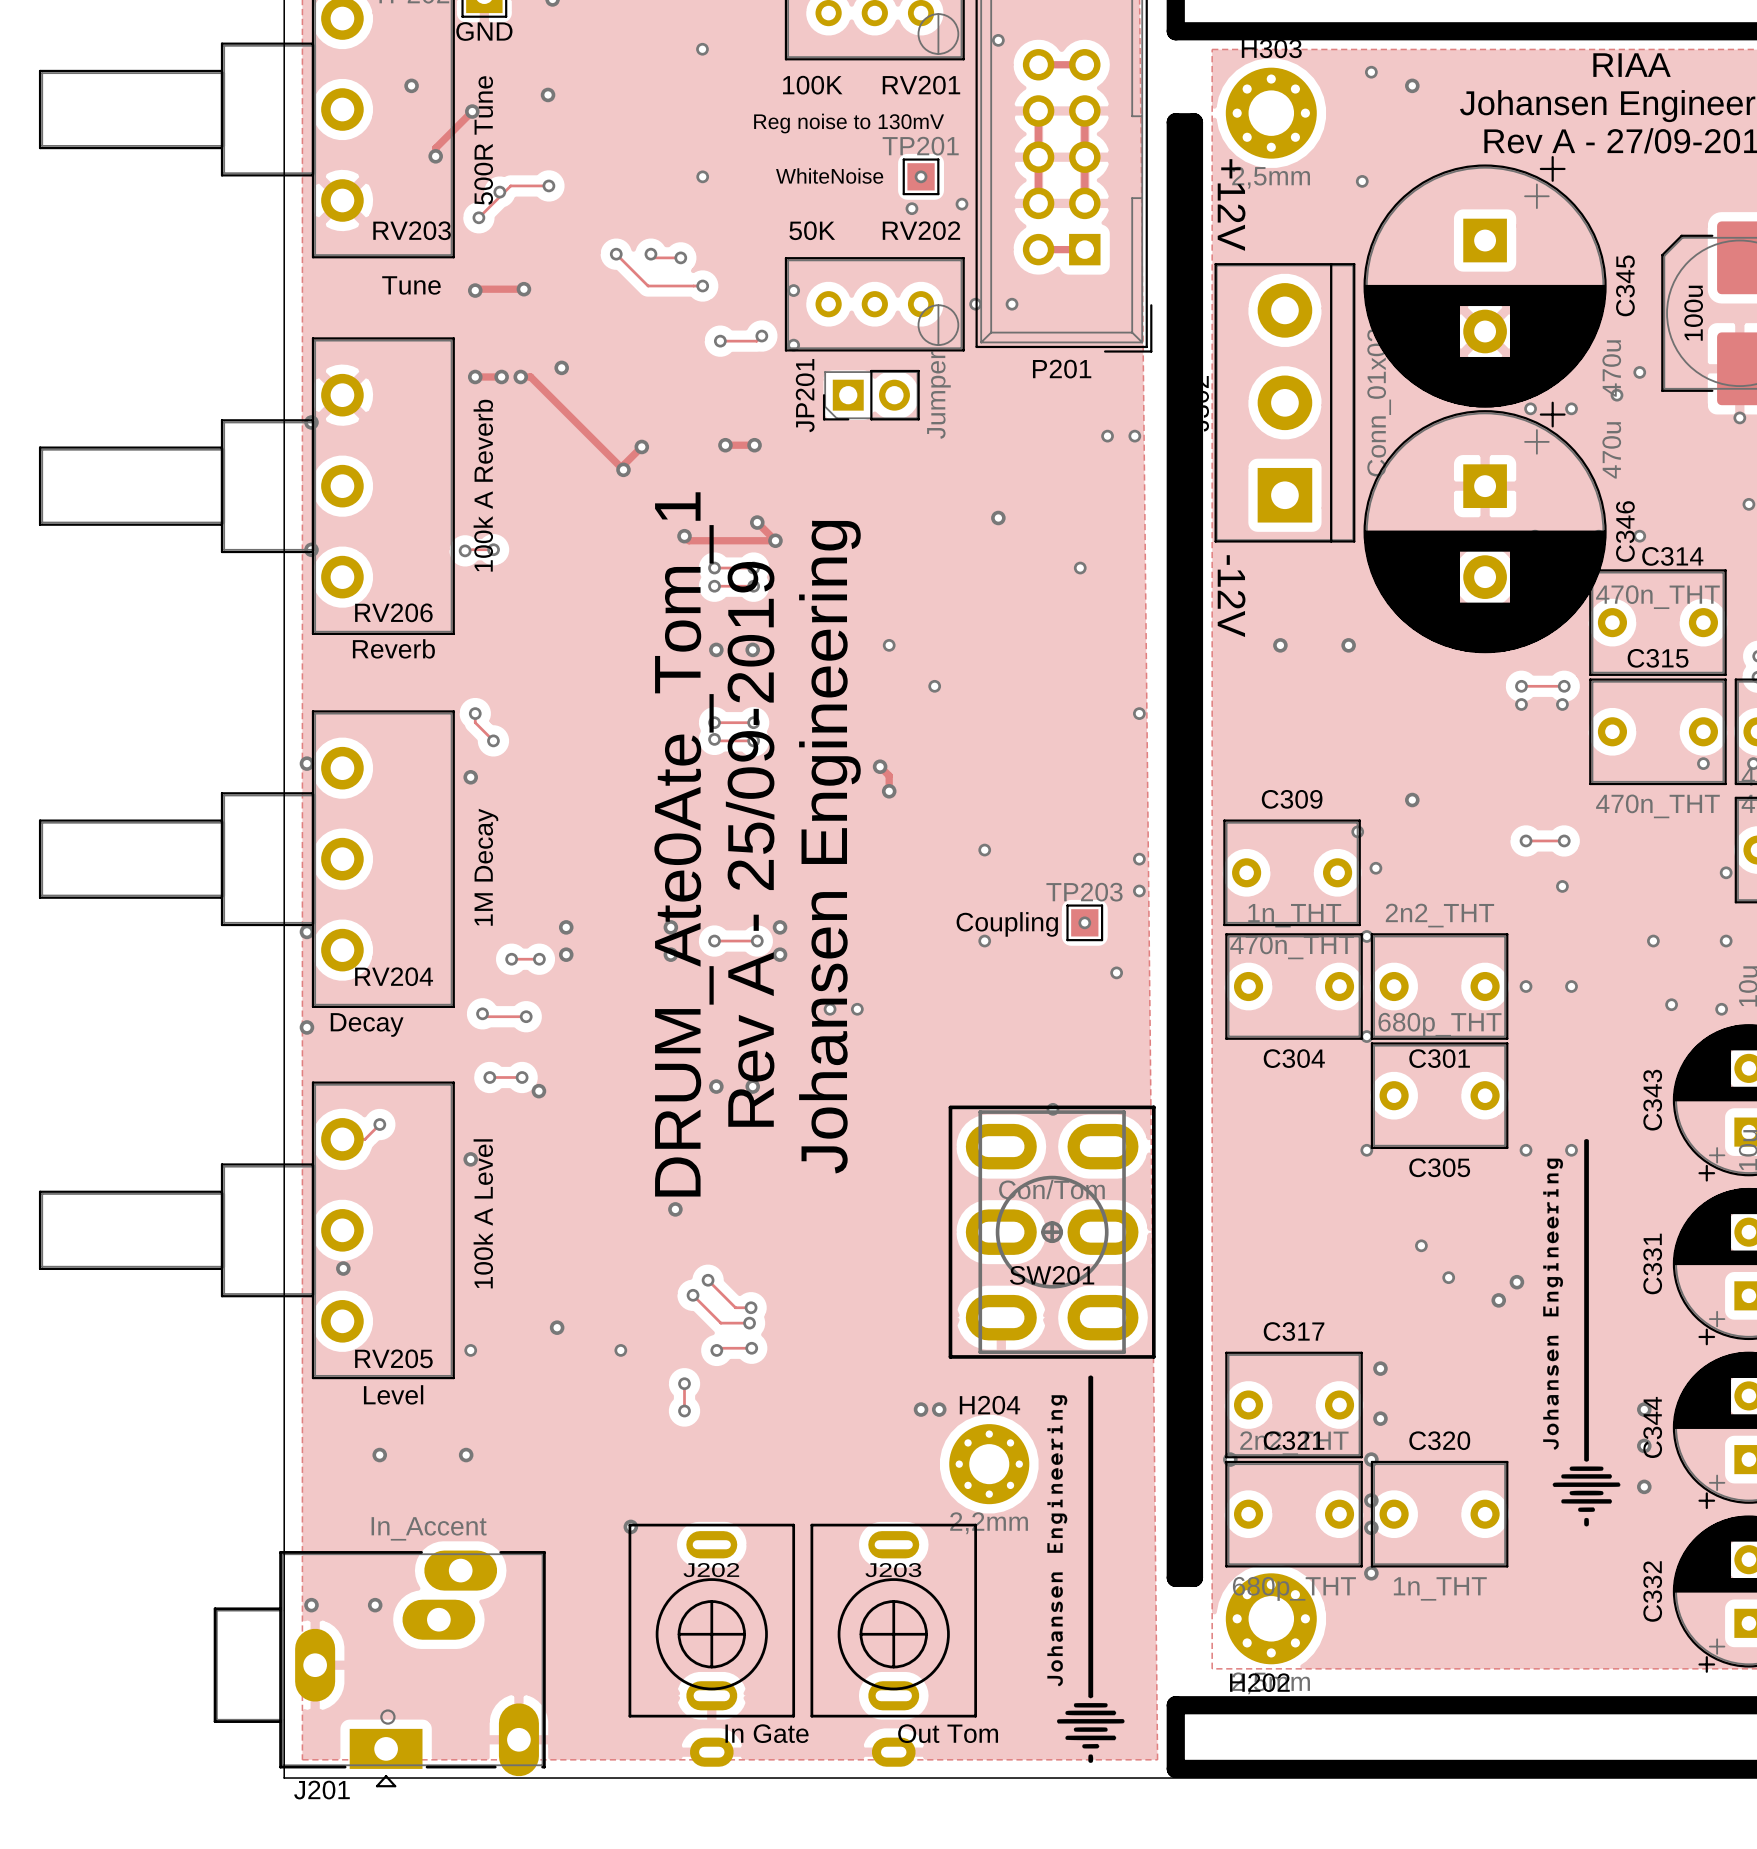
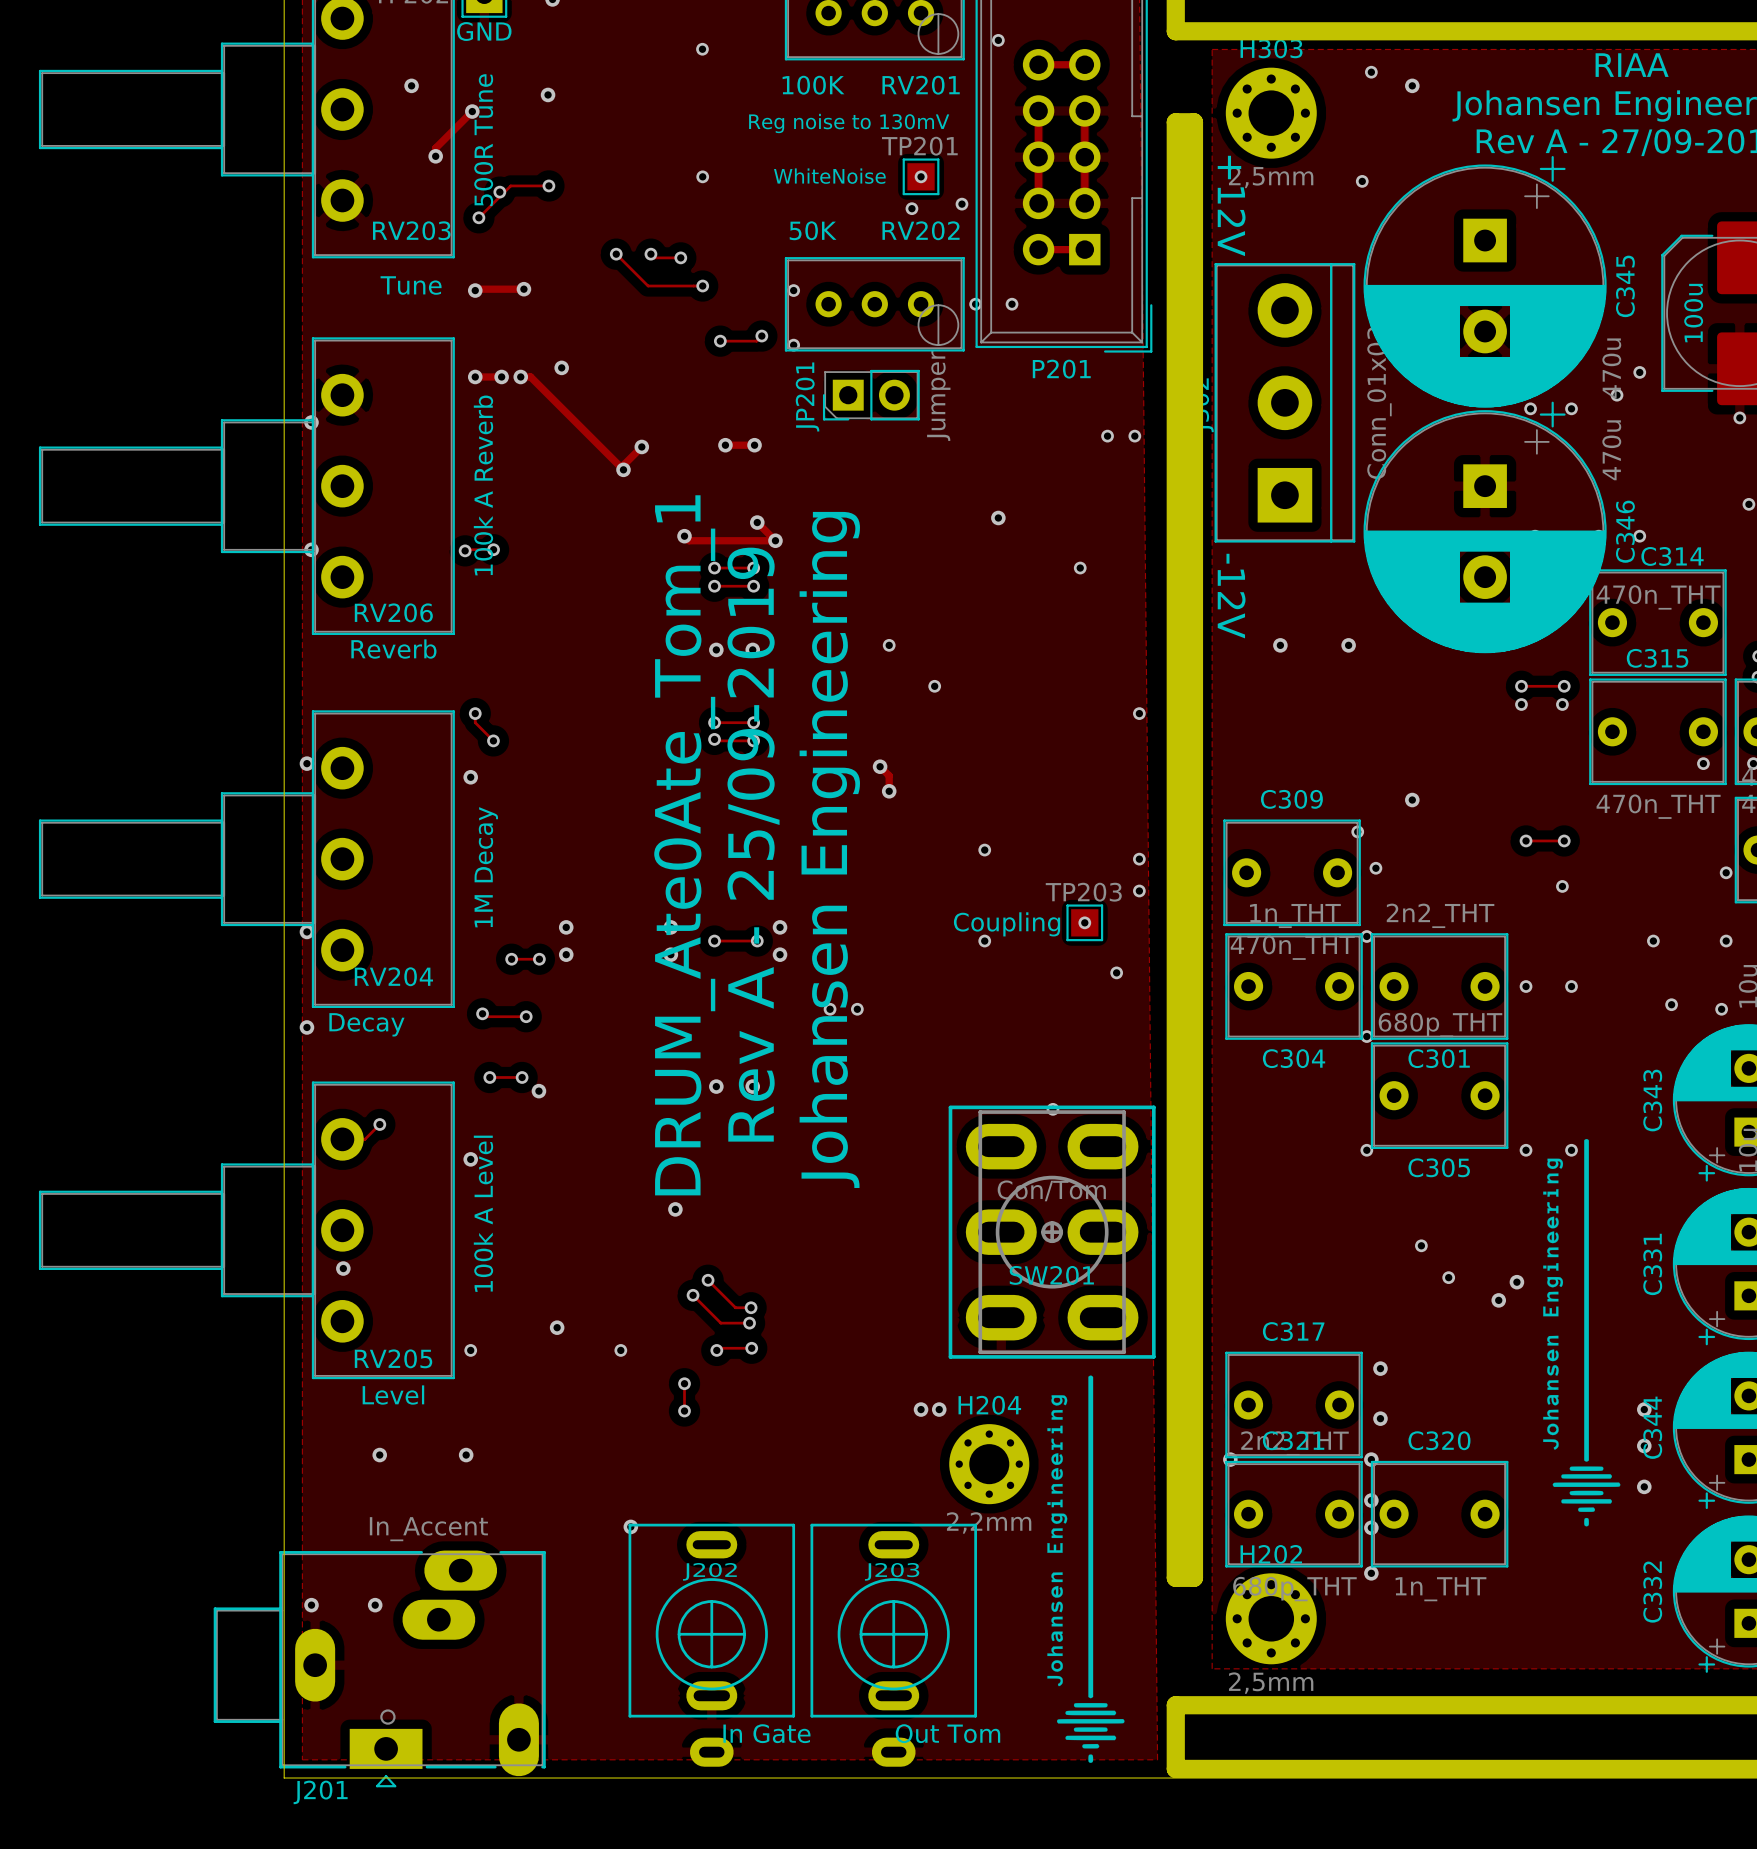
H202 name position: H202 (1259, 1682) -> H202 (1271, 1554)

